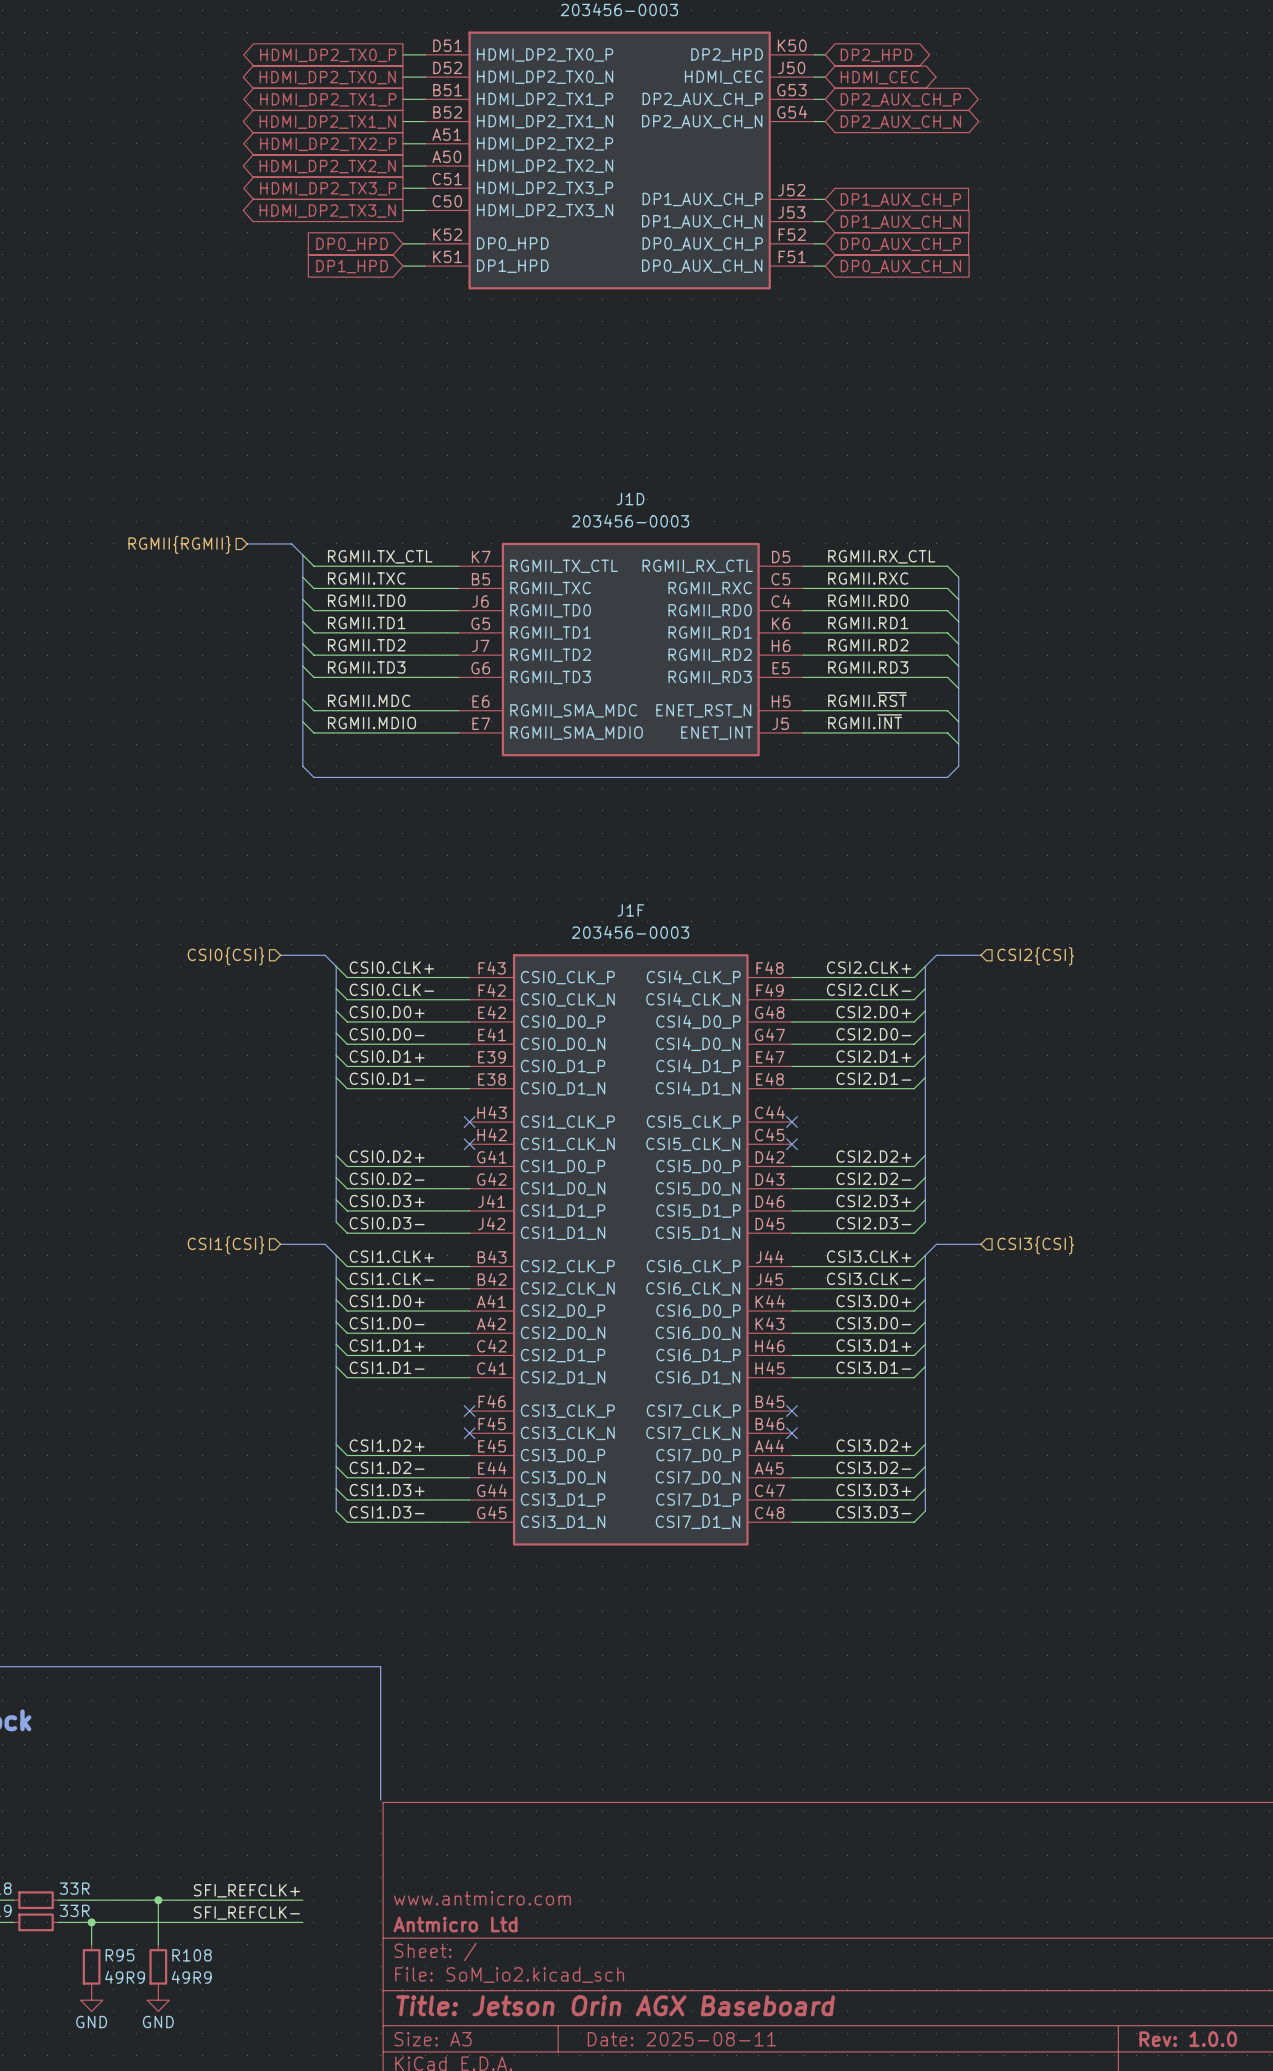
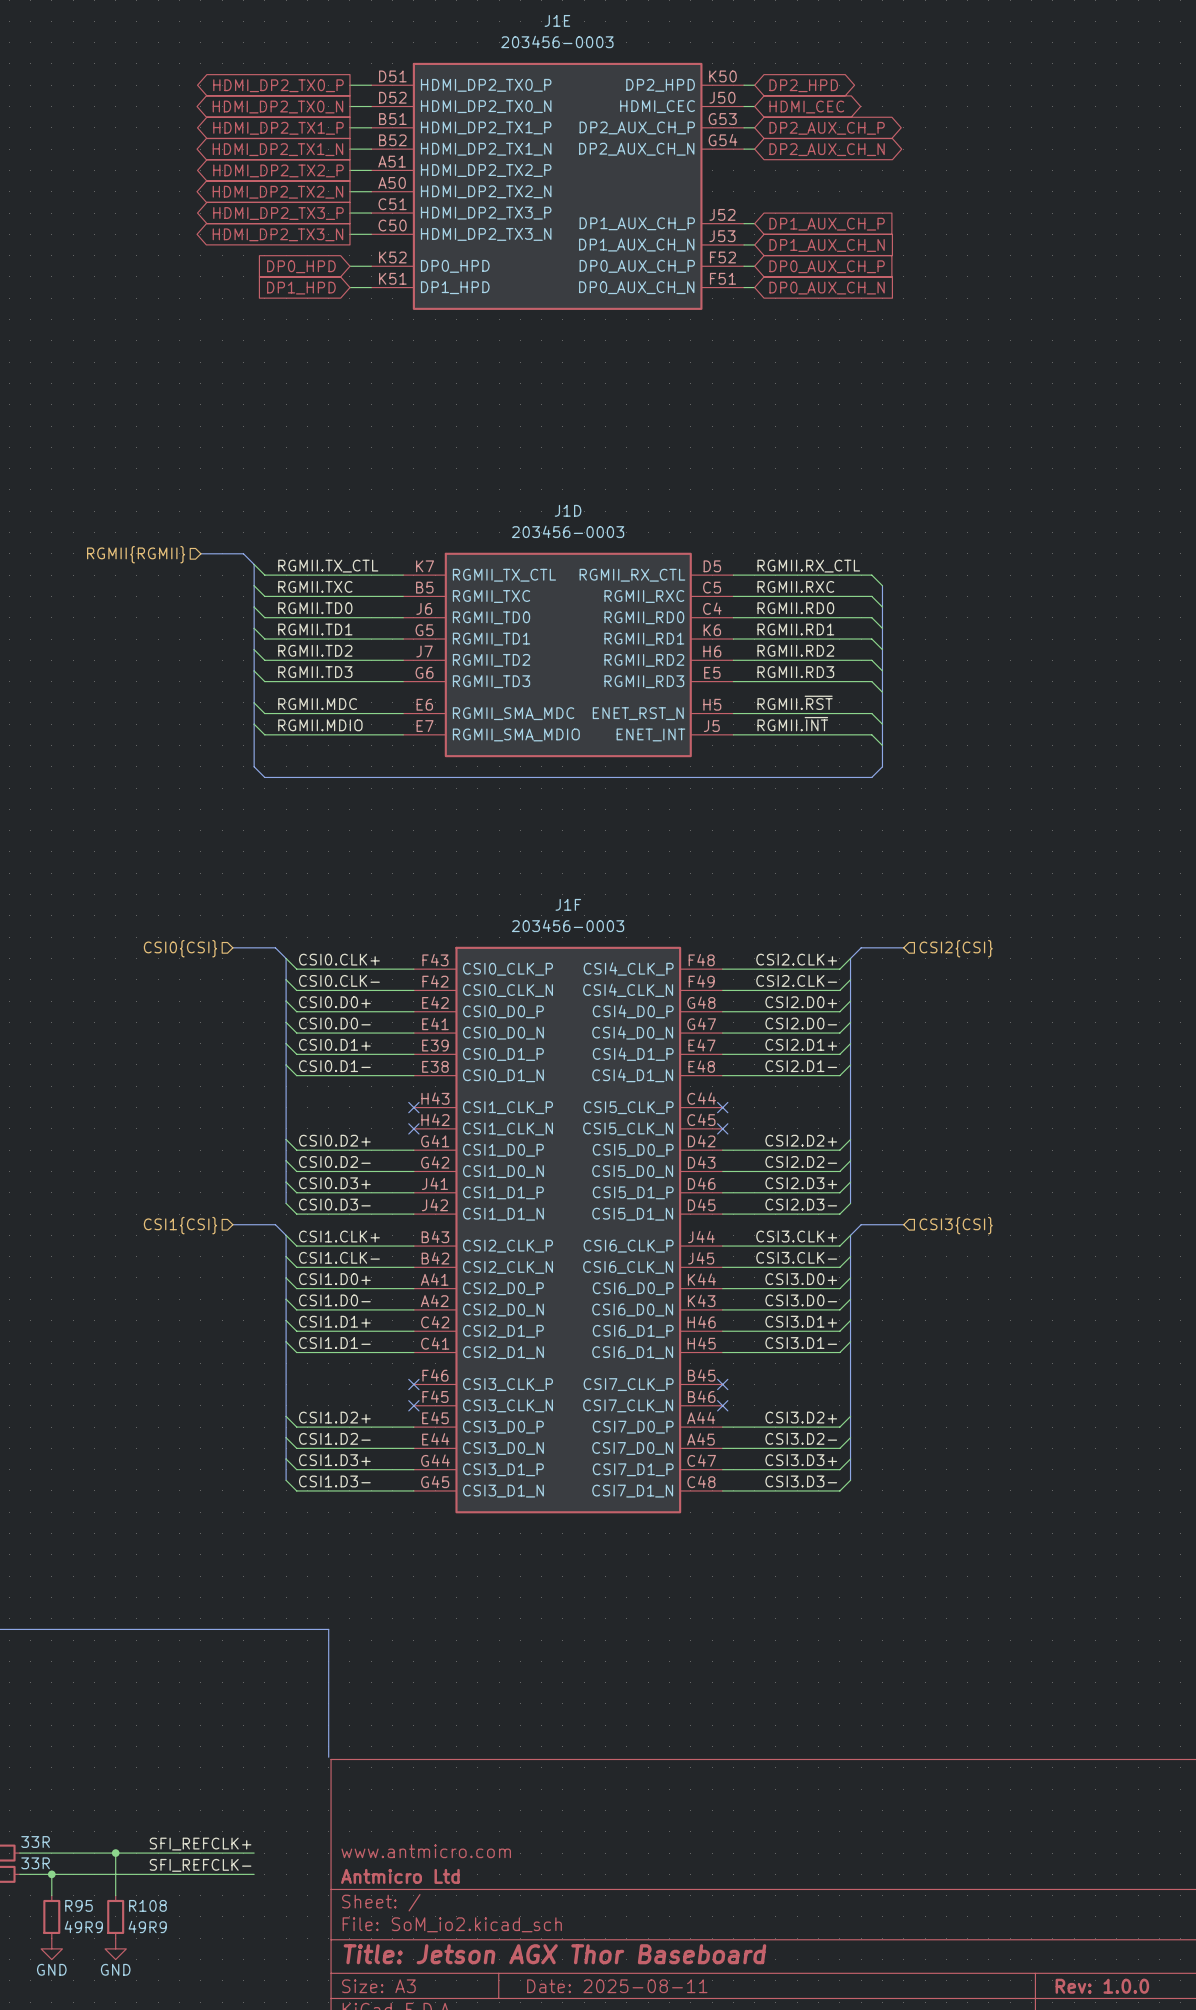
title block: Title: Jetson Orin AGX Baseboard (615, 2005) -> Title: Jetson AGX Thor Baseboard (554, 1954)

